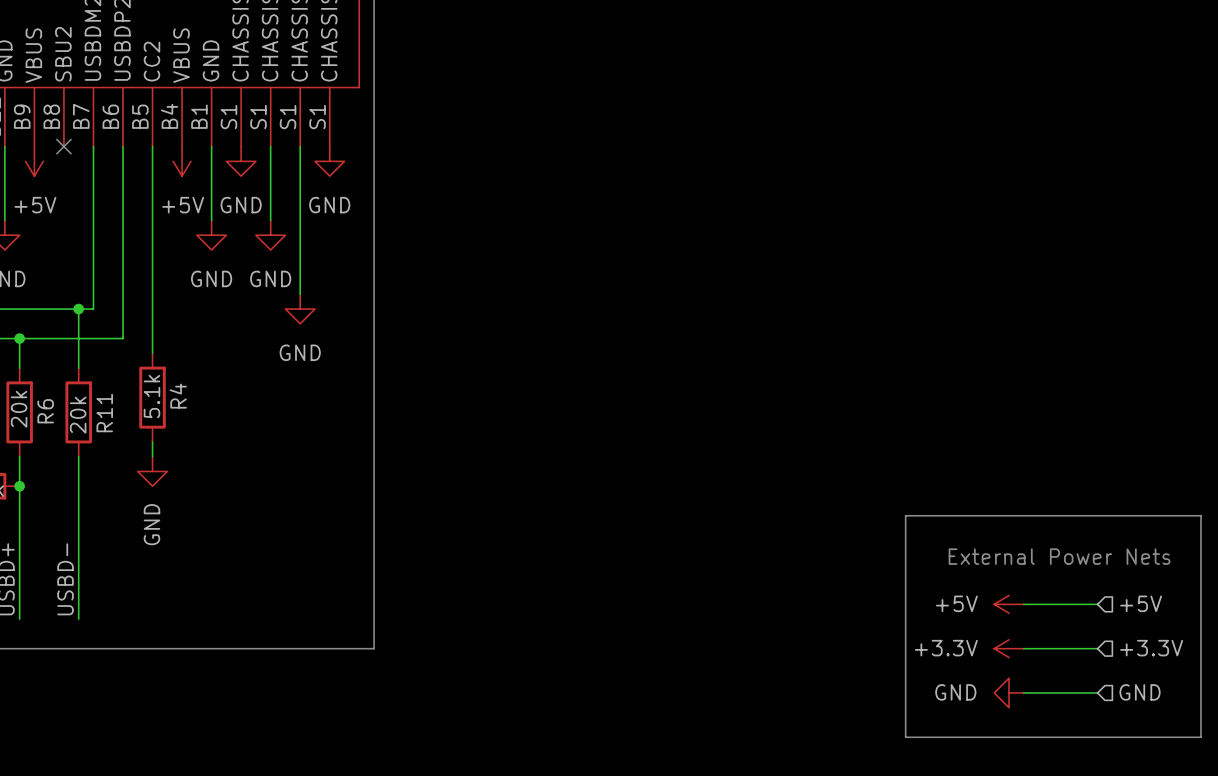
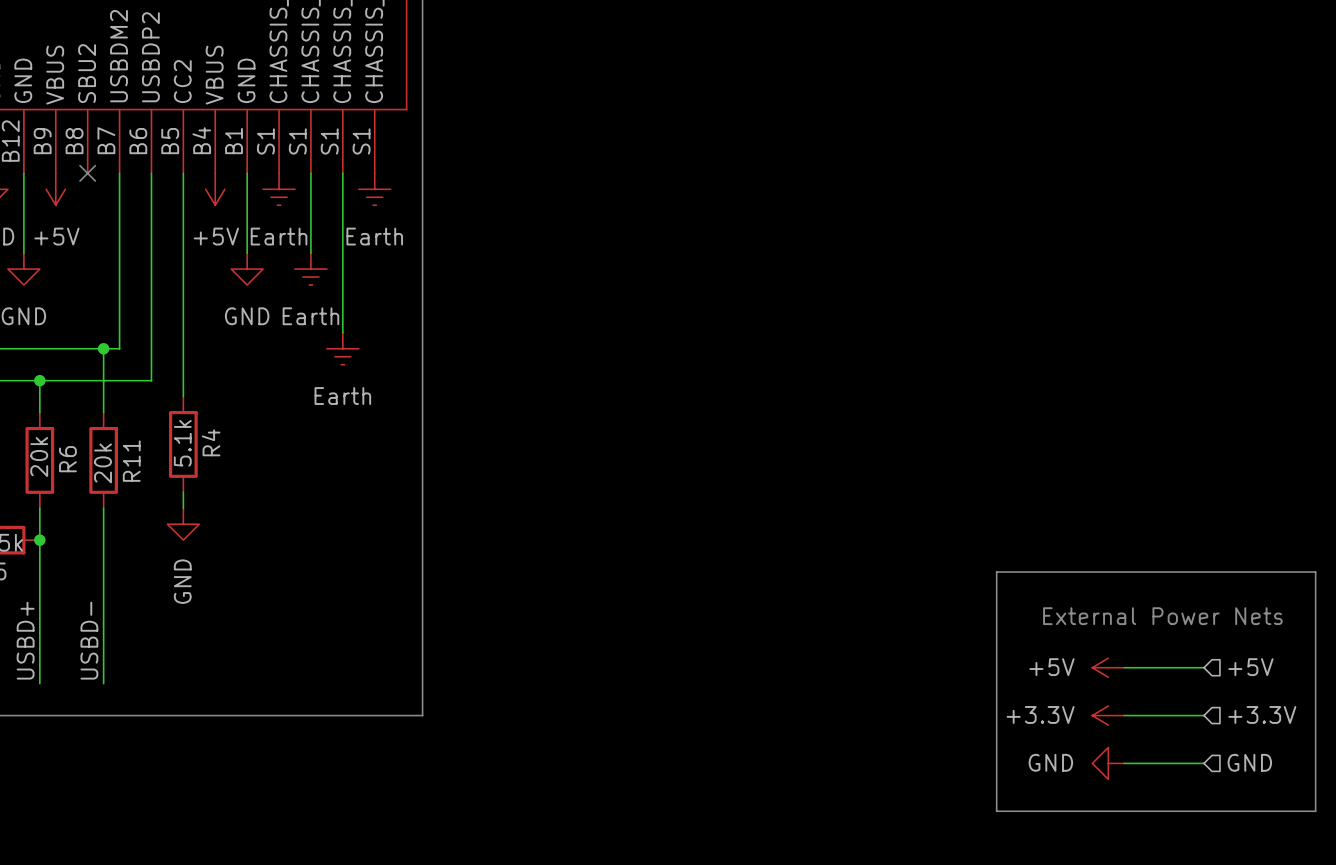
power symbol: GND (241, 161) -> Earth (279, 189)
power symbol: GND (329, 161) -> Earth (374, 189)
power symbol: GND (270, 235) -> Earth (310, 269)
power symbol: GND (300, 309) -> Earth (342, 348)

